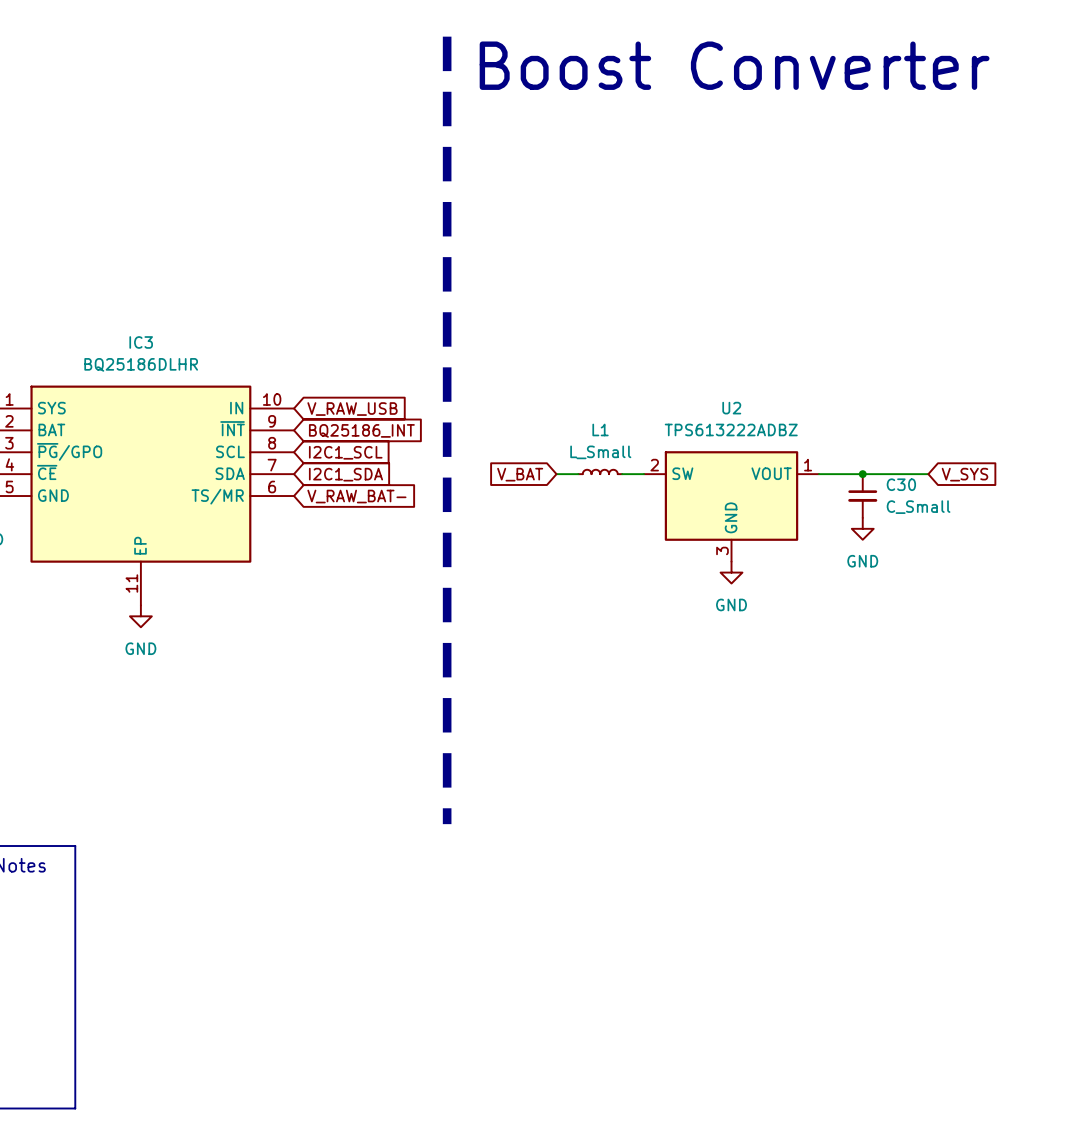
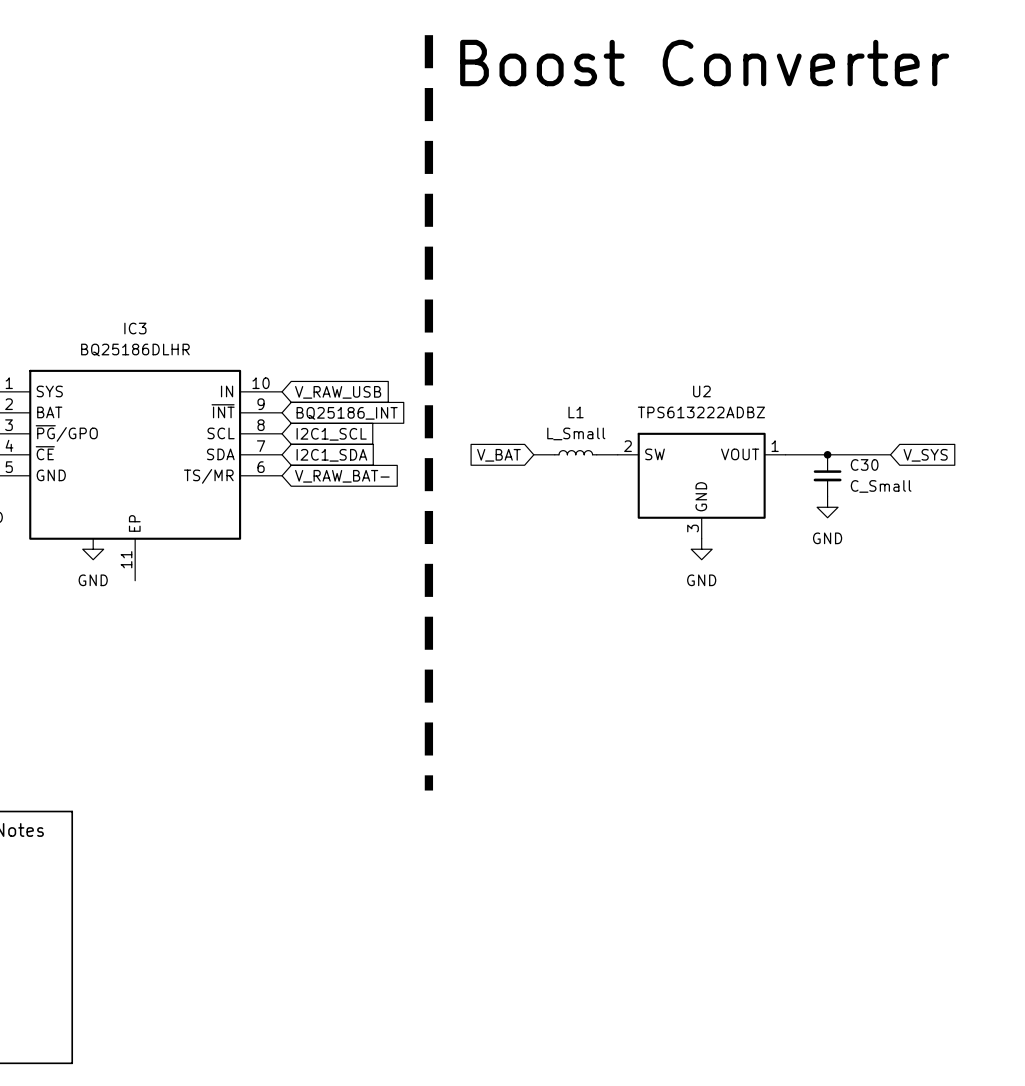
power symbol position: GND (140, 616) -> GND (93, 549)

